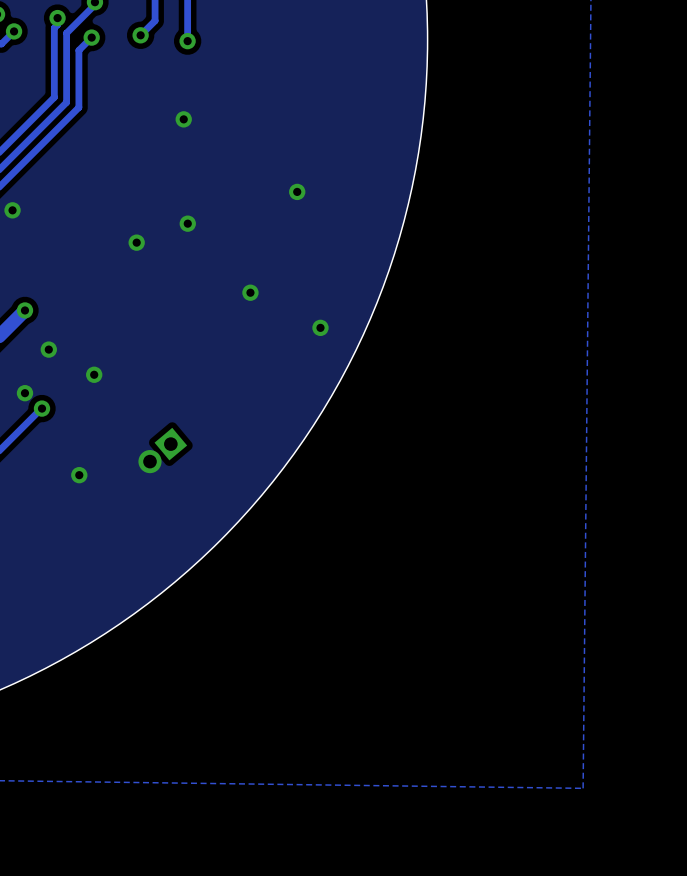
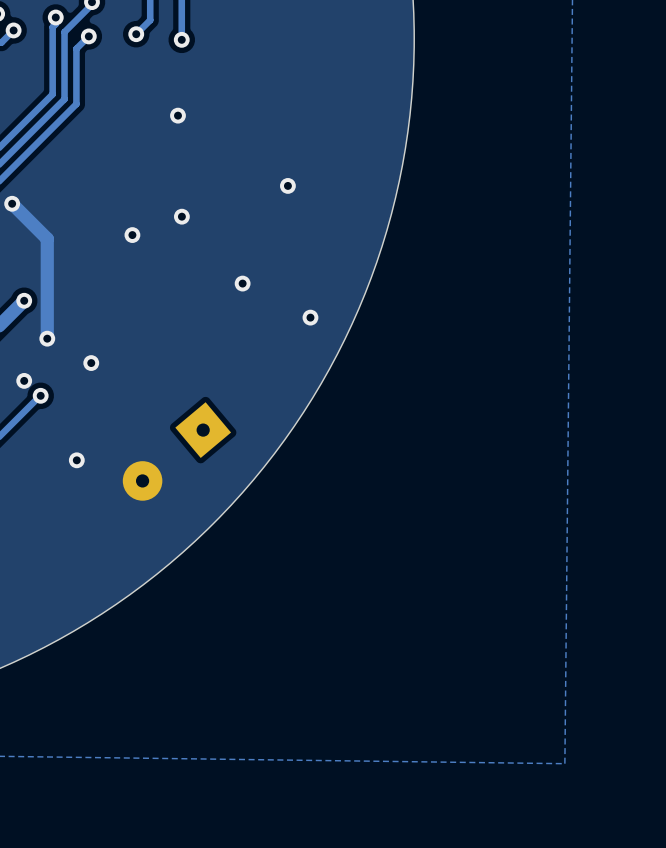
track: none -> (12, 203) (47, 238) (47, 338)
part footprint: [138, 427, 188, 474] -> [122, 402, 232, 501]

